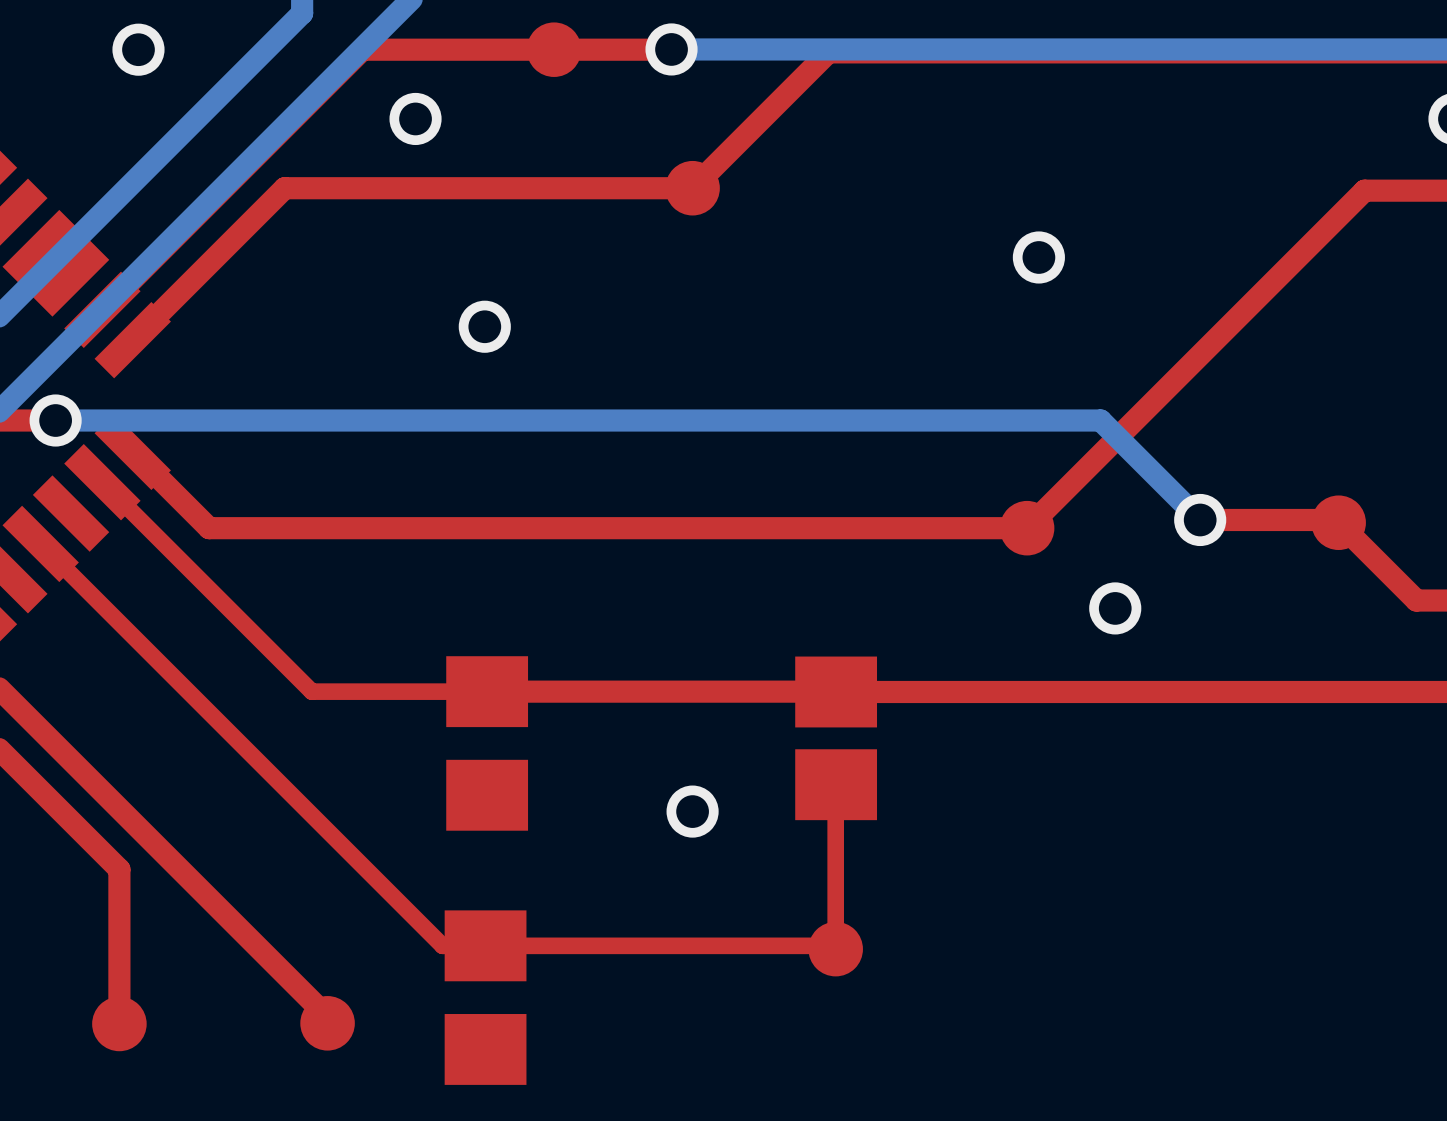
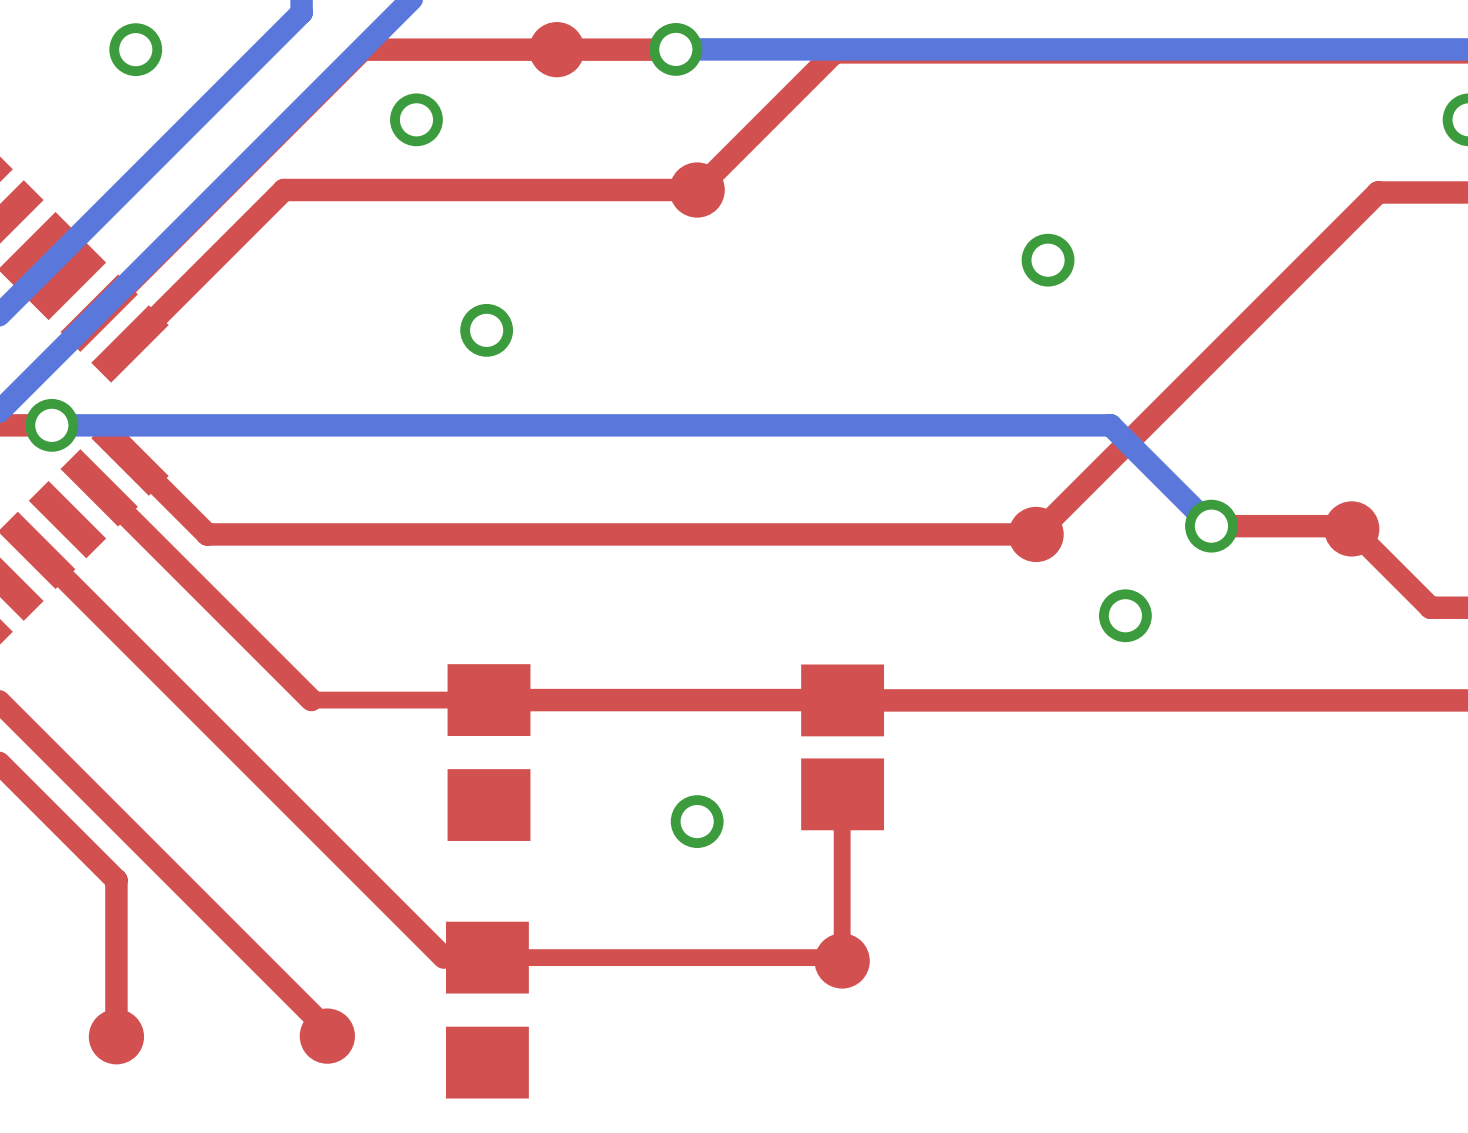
top track width: thin (102, 482) (311, 691) -> thick (99, 487) (311, 700)
top track width: thin (40, 543) (442, 945) -> thick (36, 550) (443, 957)

